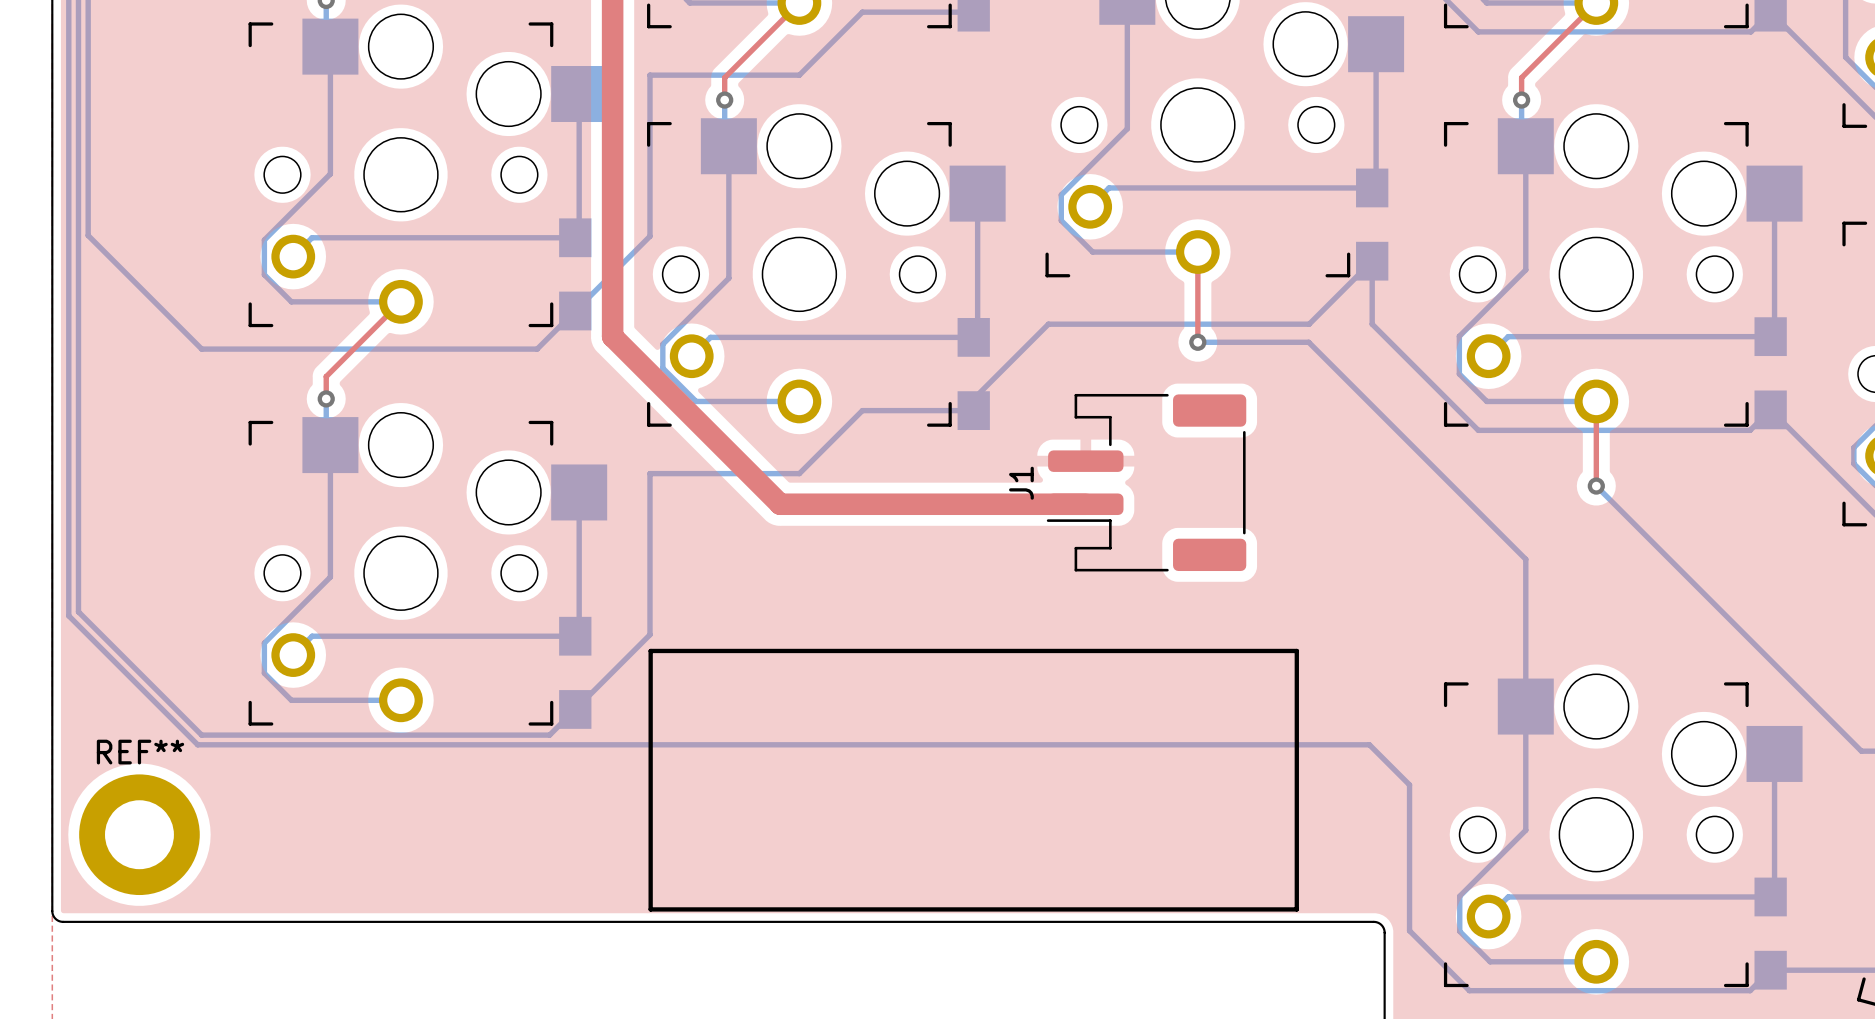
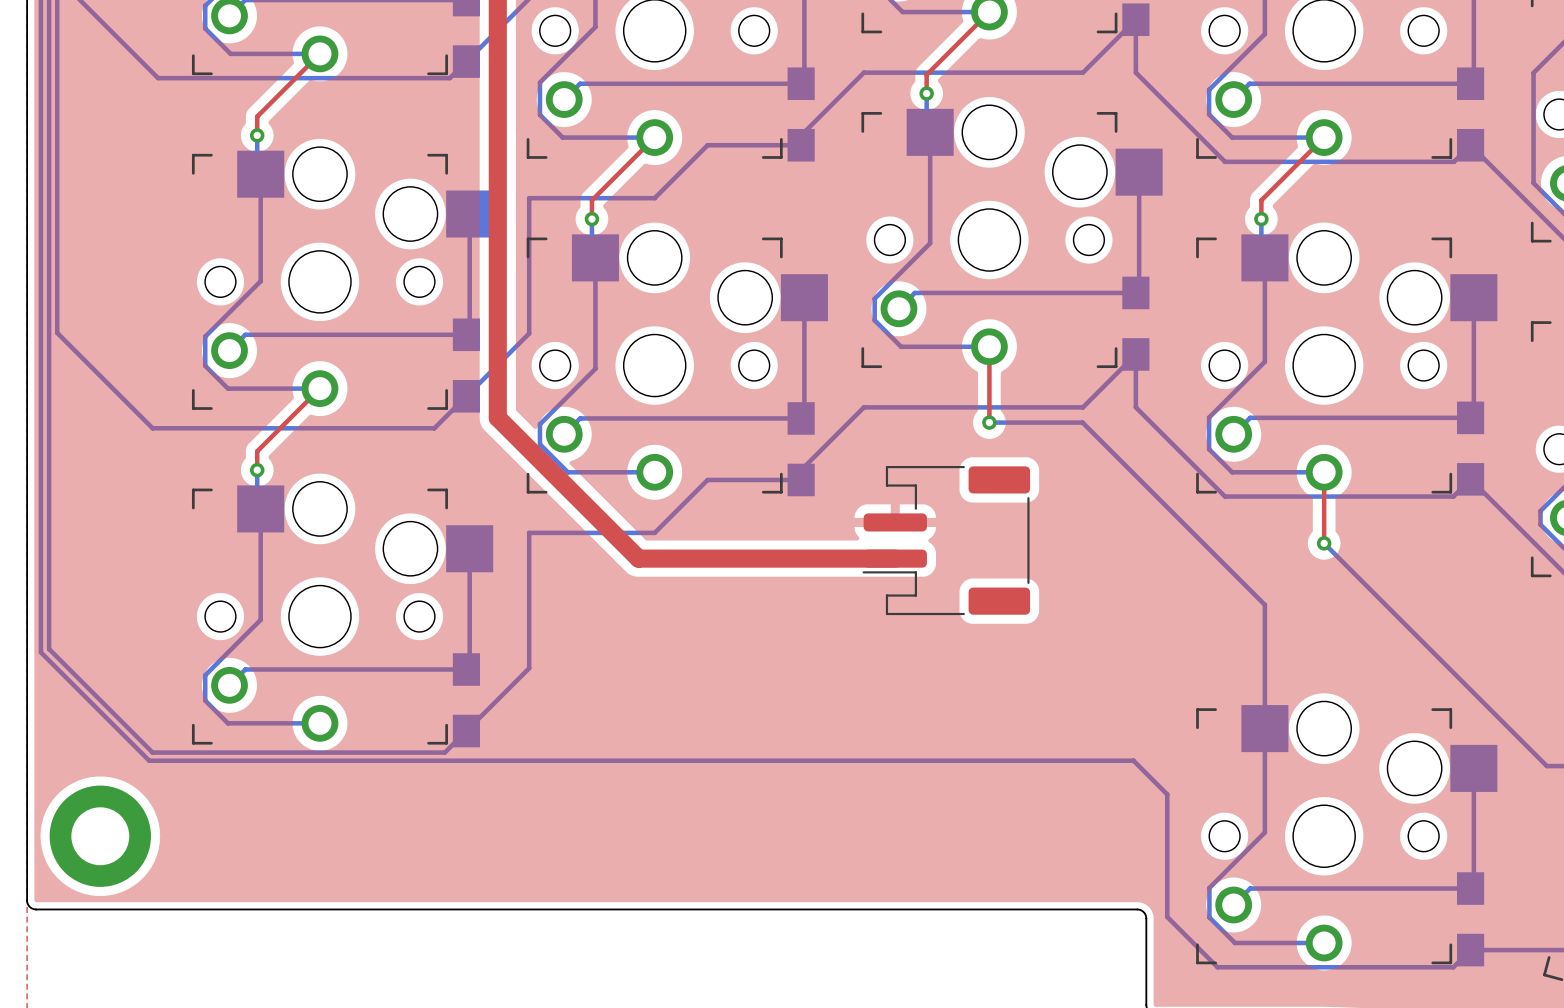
J1 name: J1 (1021, 483) -> none
line: (650, 650) (1296, 650) (1296, 909) (650, 909) (650, 650) -> none
REF** name: REF** (140, 752) -> none

